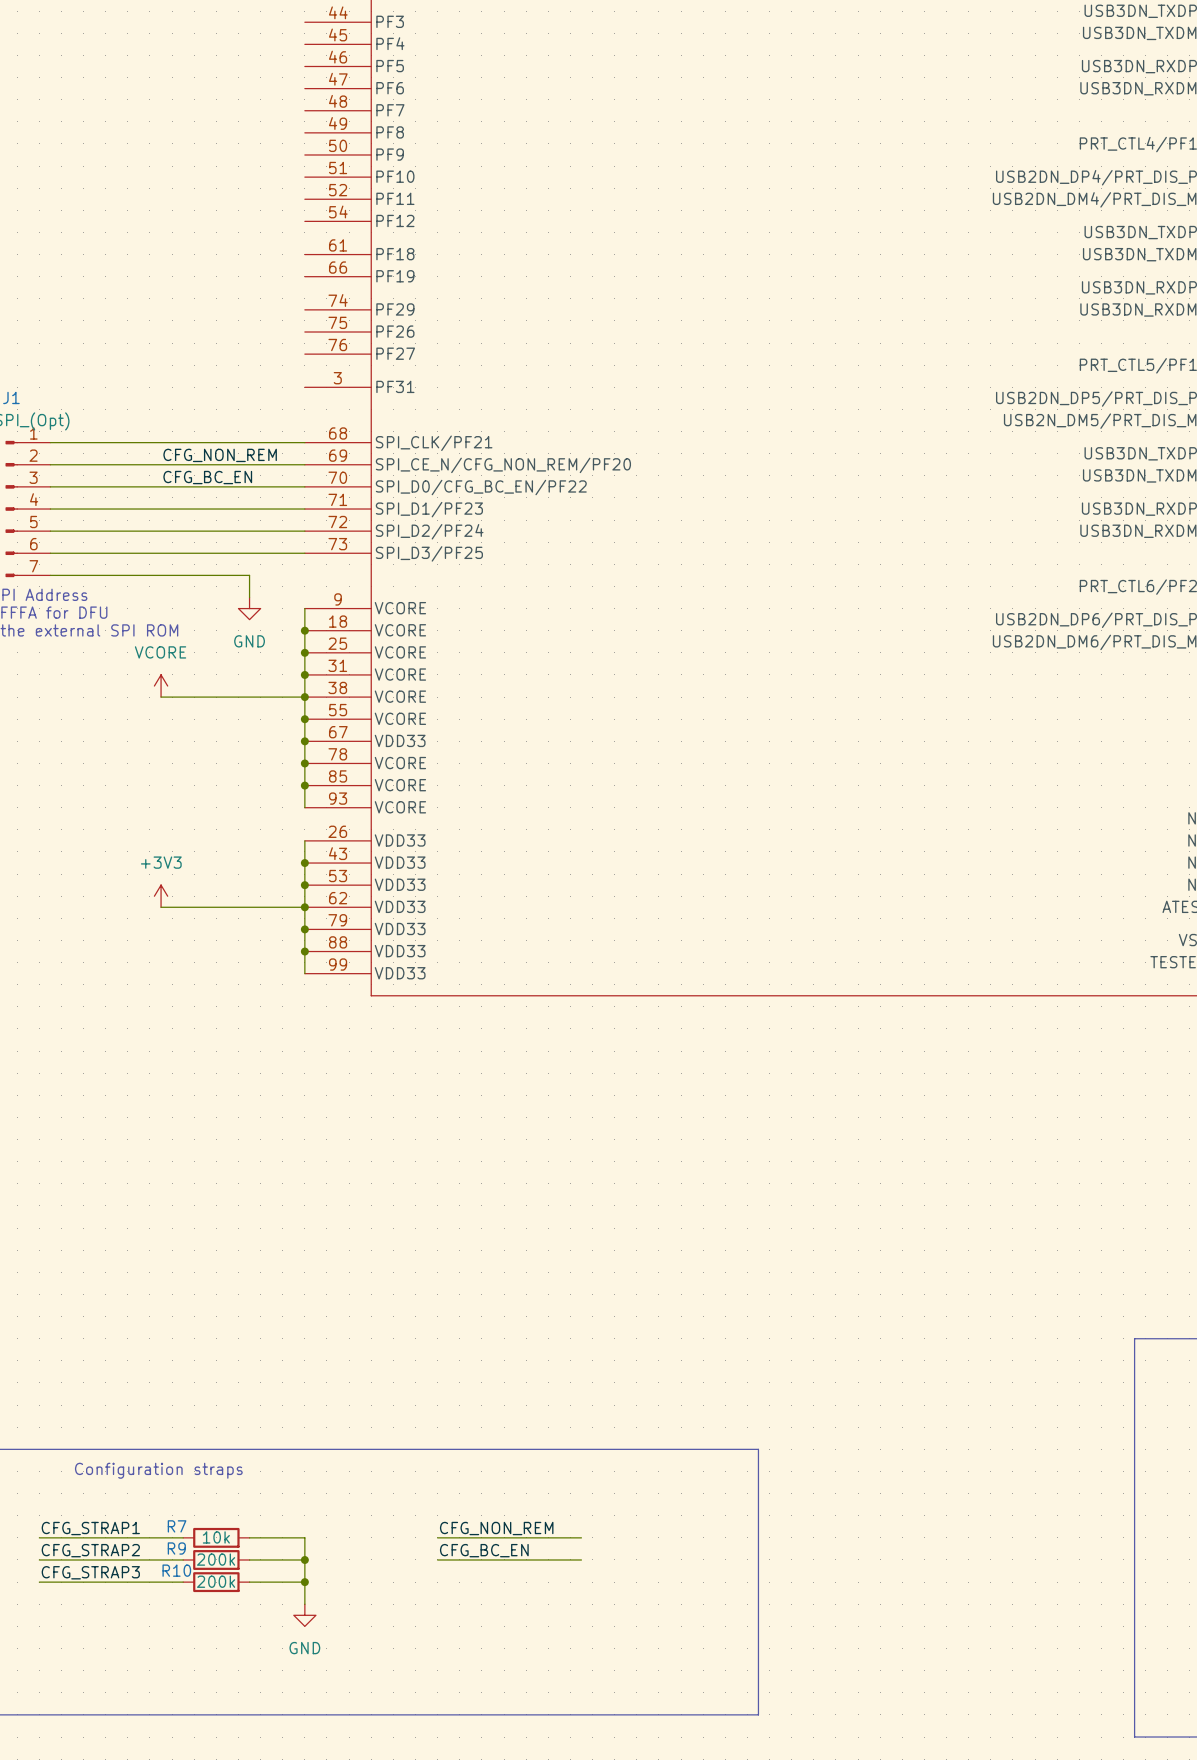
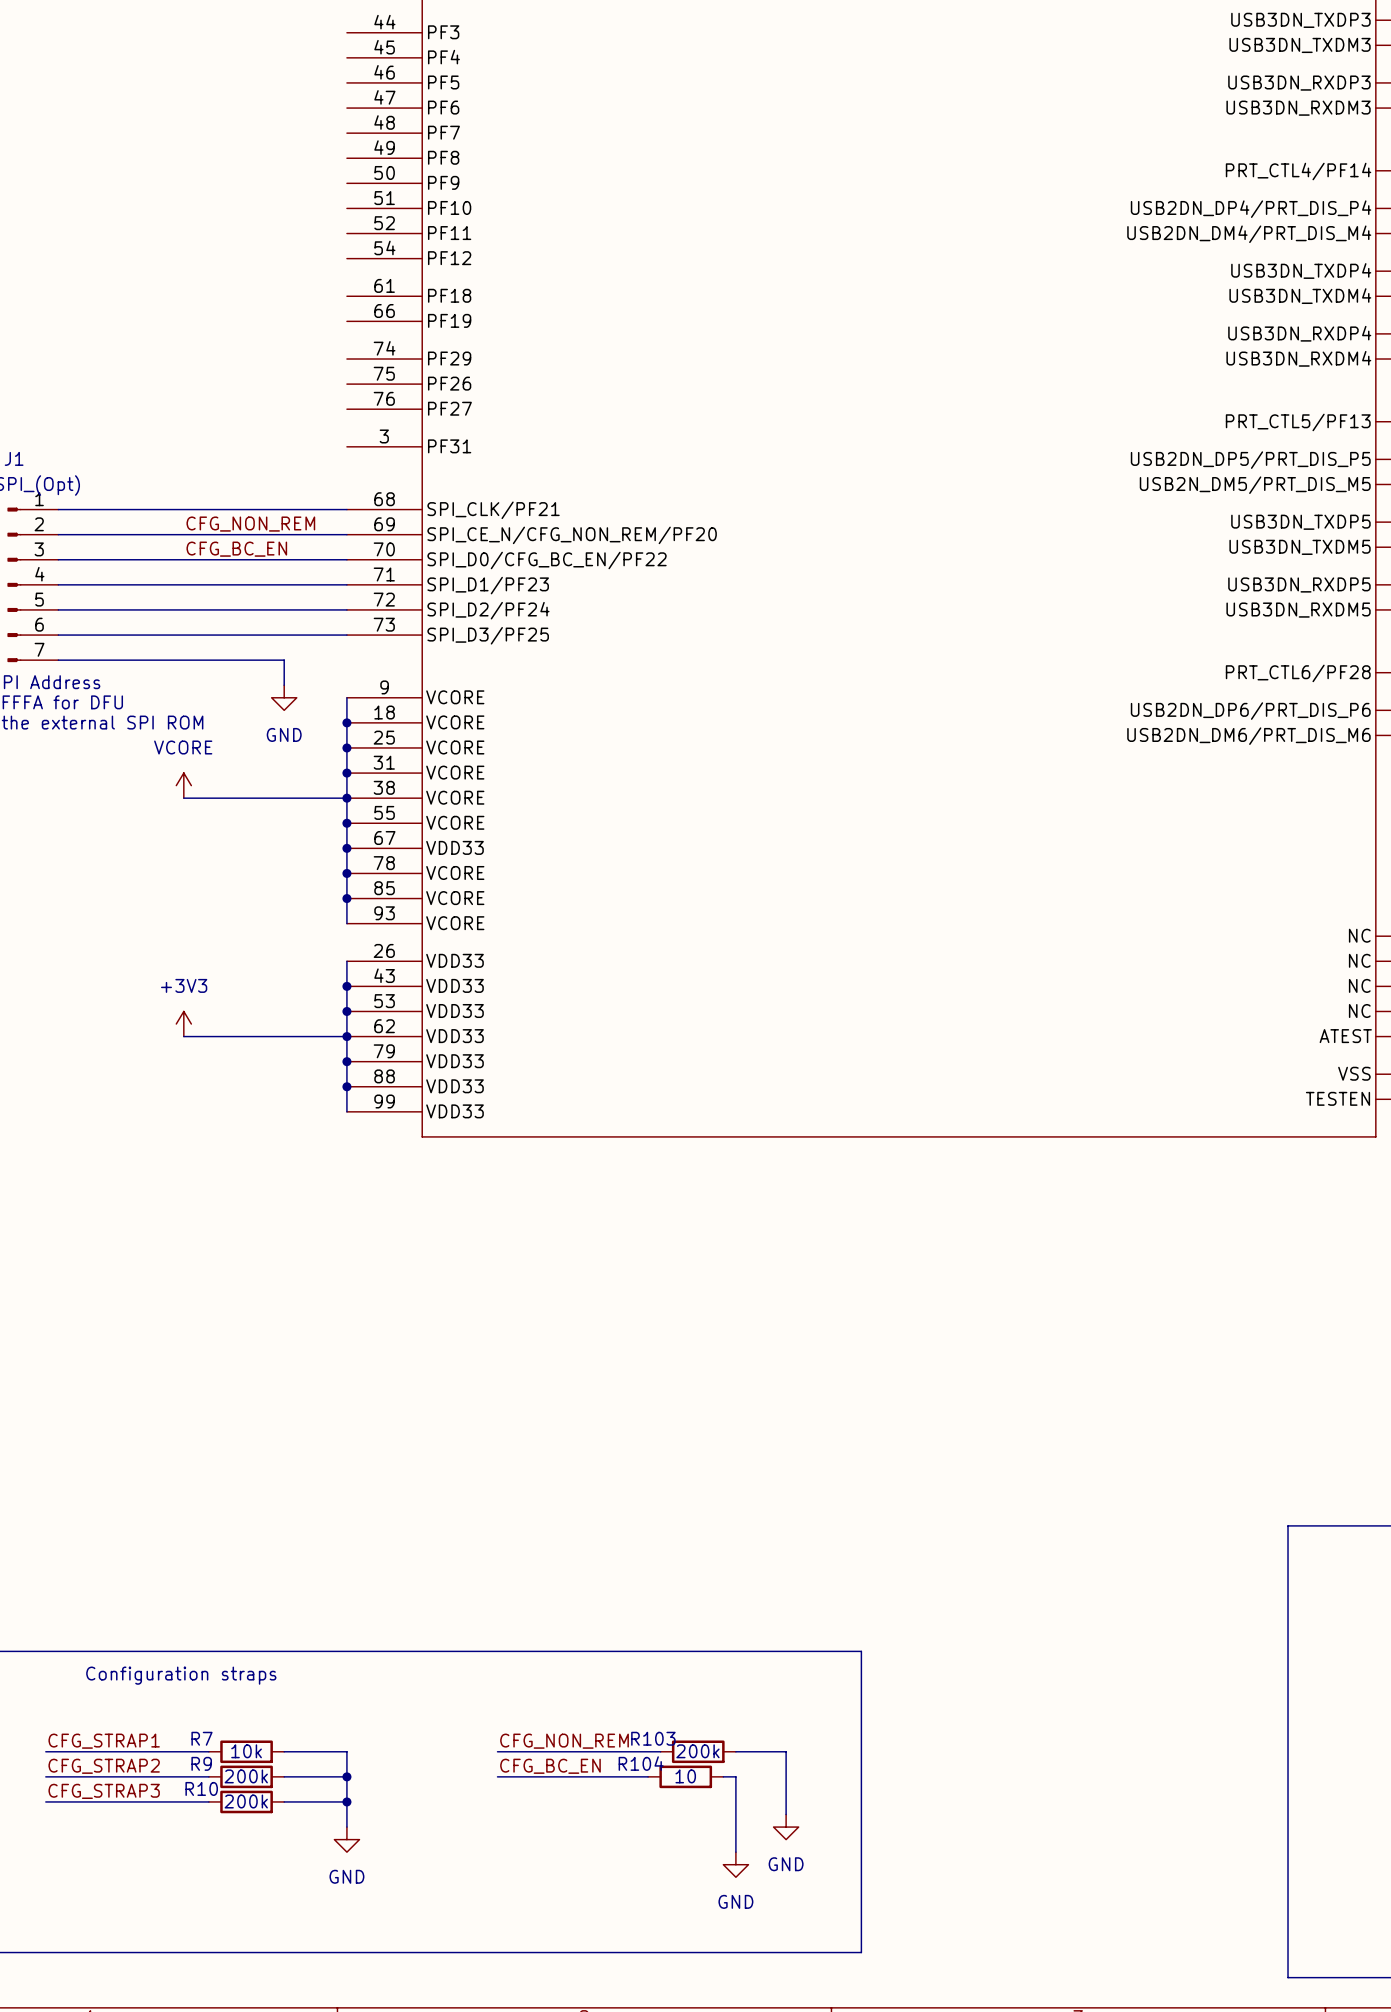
R103: none -> 200k (698, 1751)
wire: none -> (735, 1751) (786, 1751) (786, 1814)
R104: none -> 10 (685, 1776)
wire: none -> (723, 1776) (735, 1776) (735, 1852)
power symbol: none -> GND (786, 1827)
power symbol: none -> GND (735, 1864)

